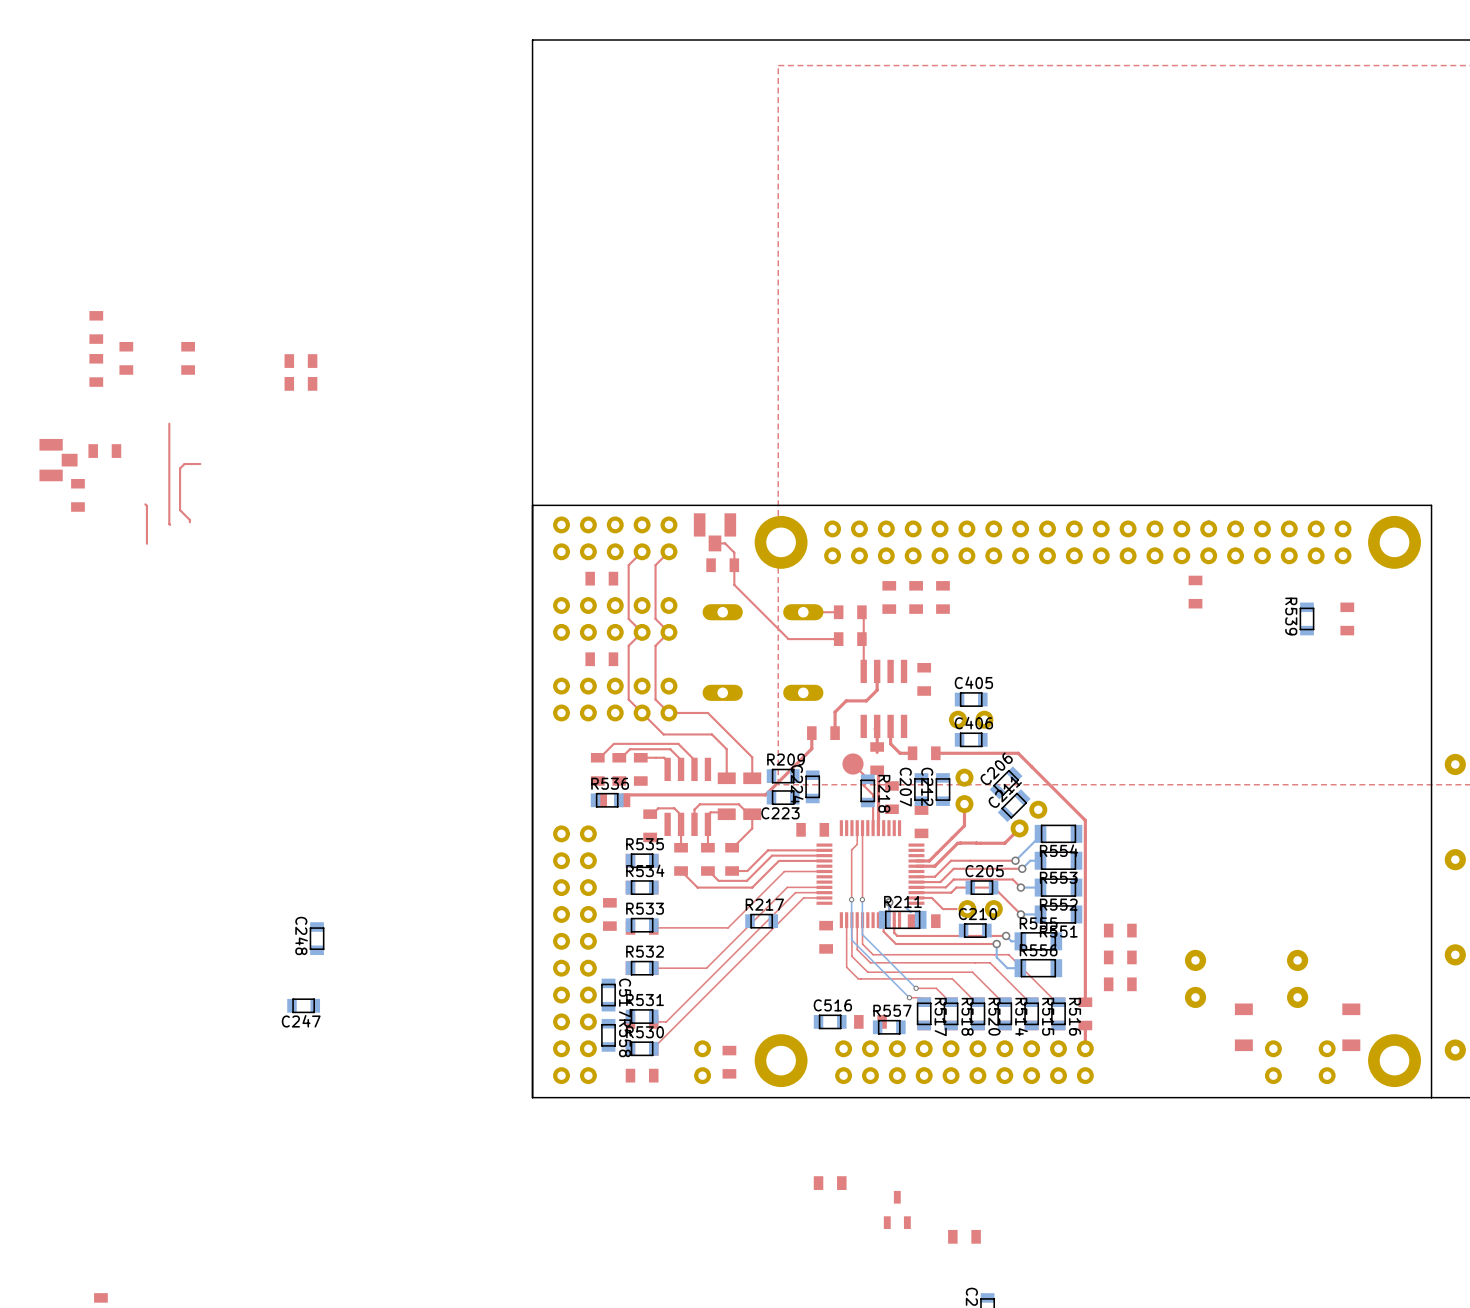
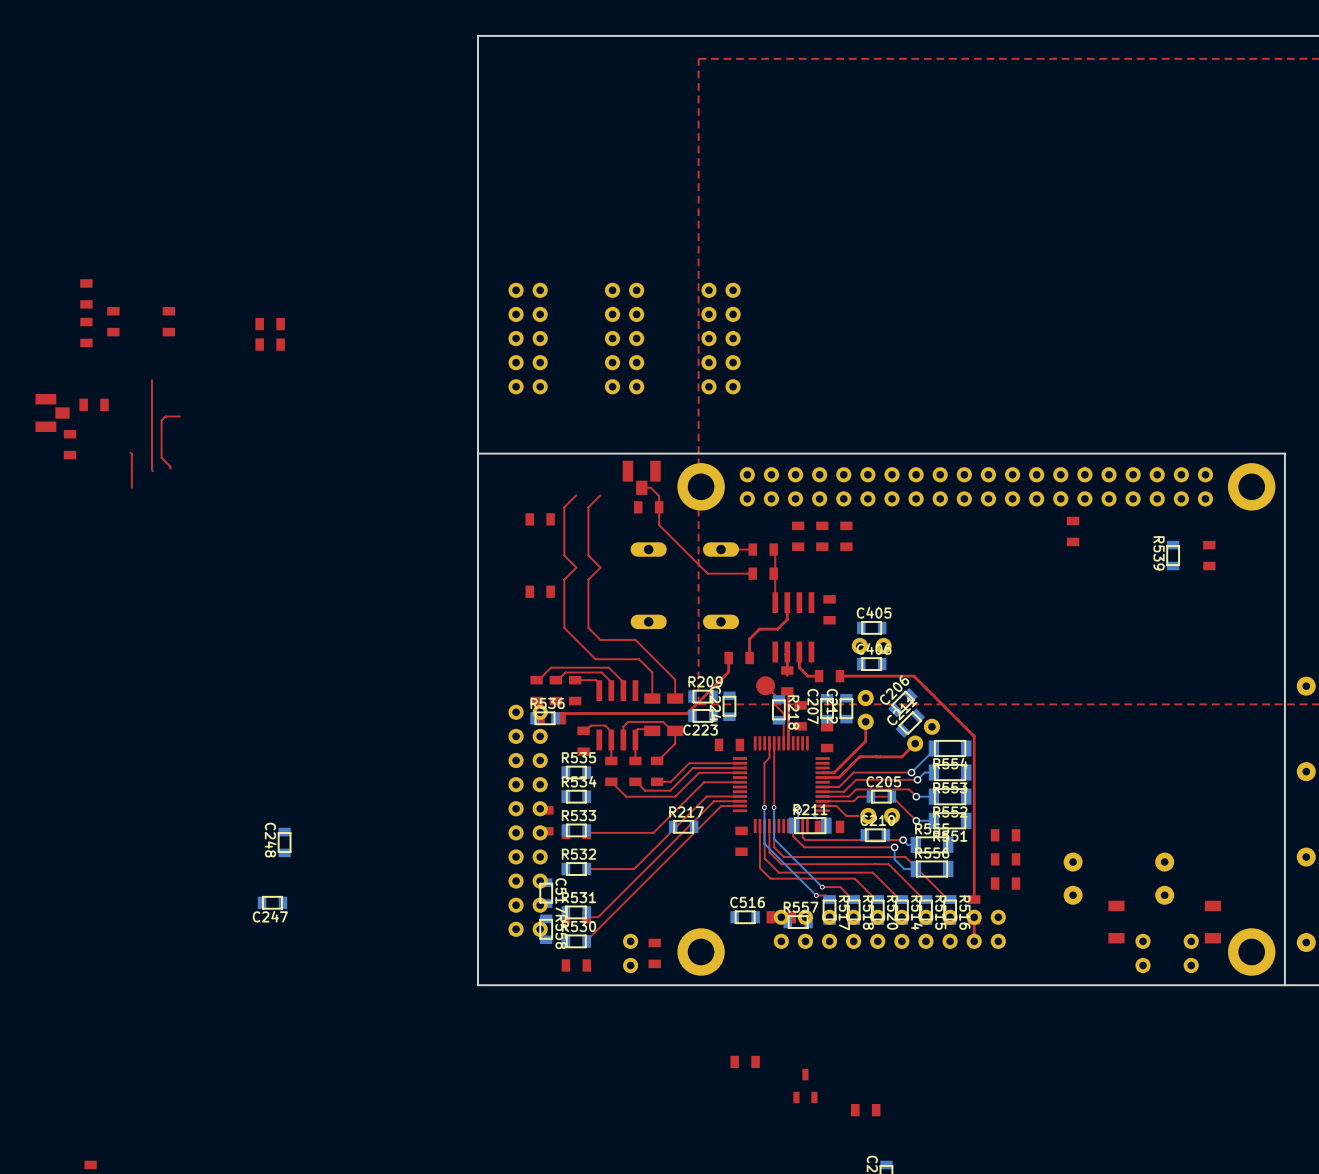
part: none -> (528, 338)
part: none -> (624, 338)
part: none -> (721, 338)
part: (615, 538) -> none
part: (615, 618) -> none
part: (615, 699) -> none
part position: (574, 954) -> (528, 820)
part position: (964, 1062) -> (889, 929)

